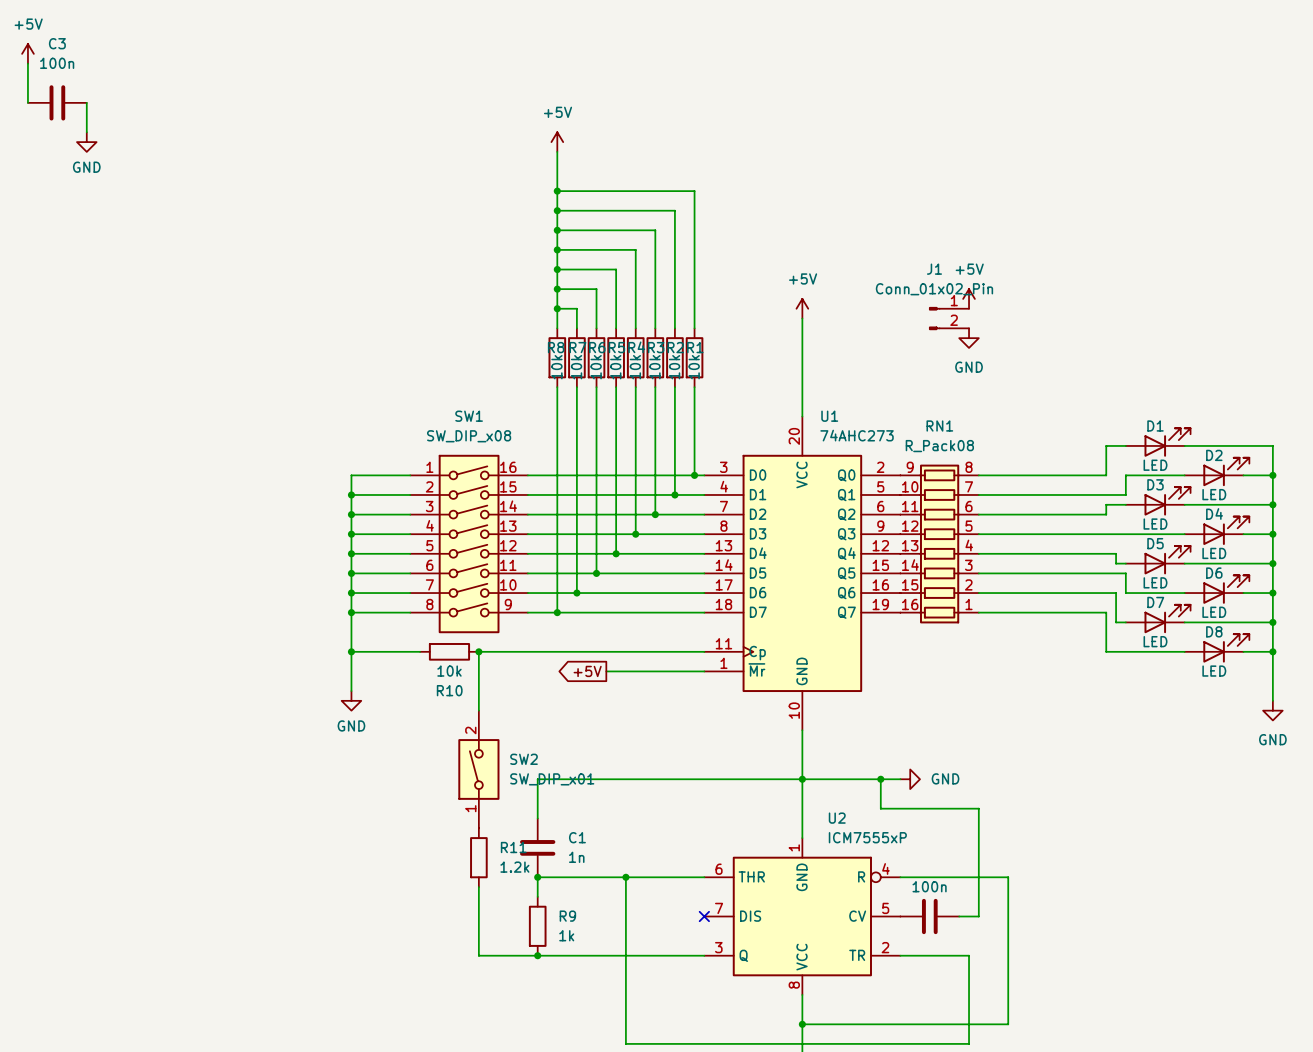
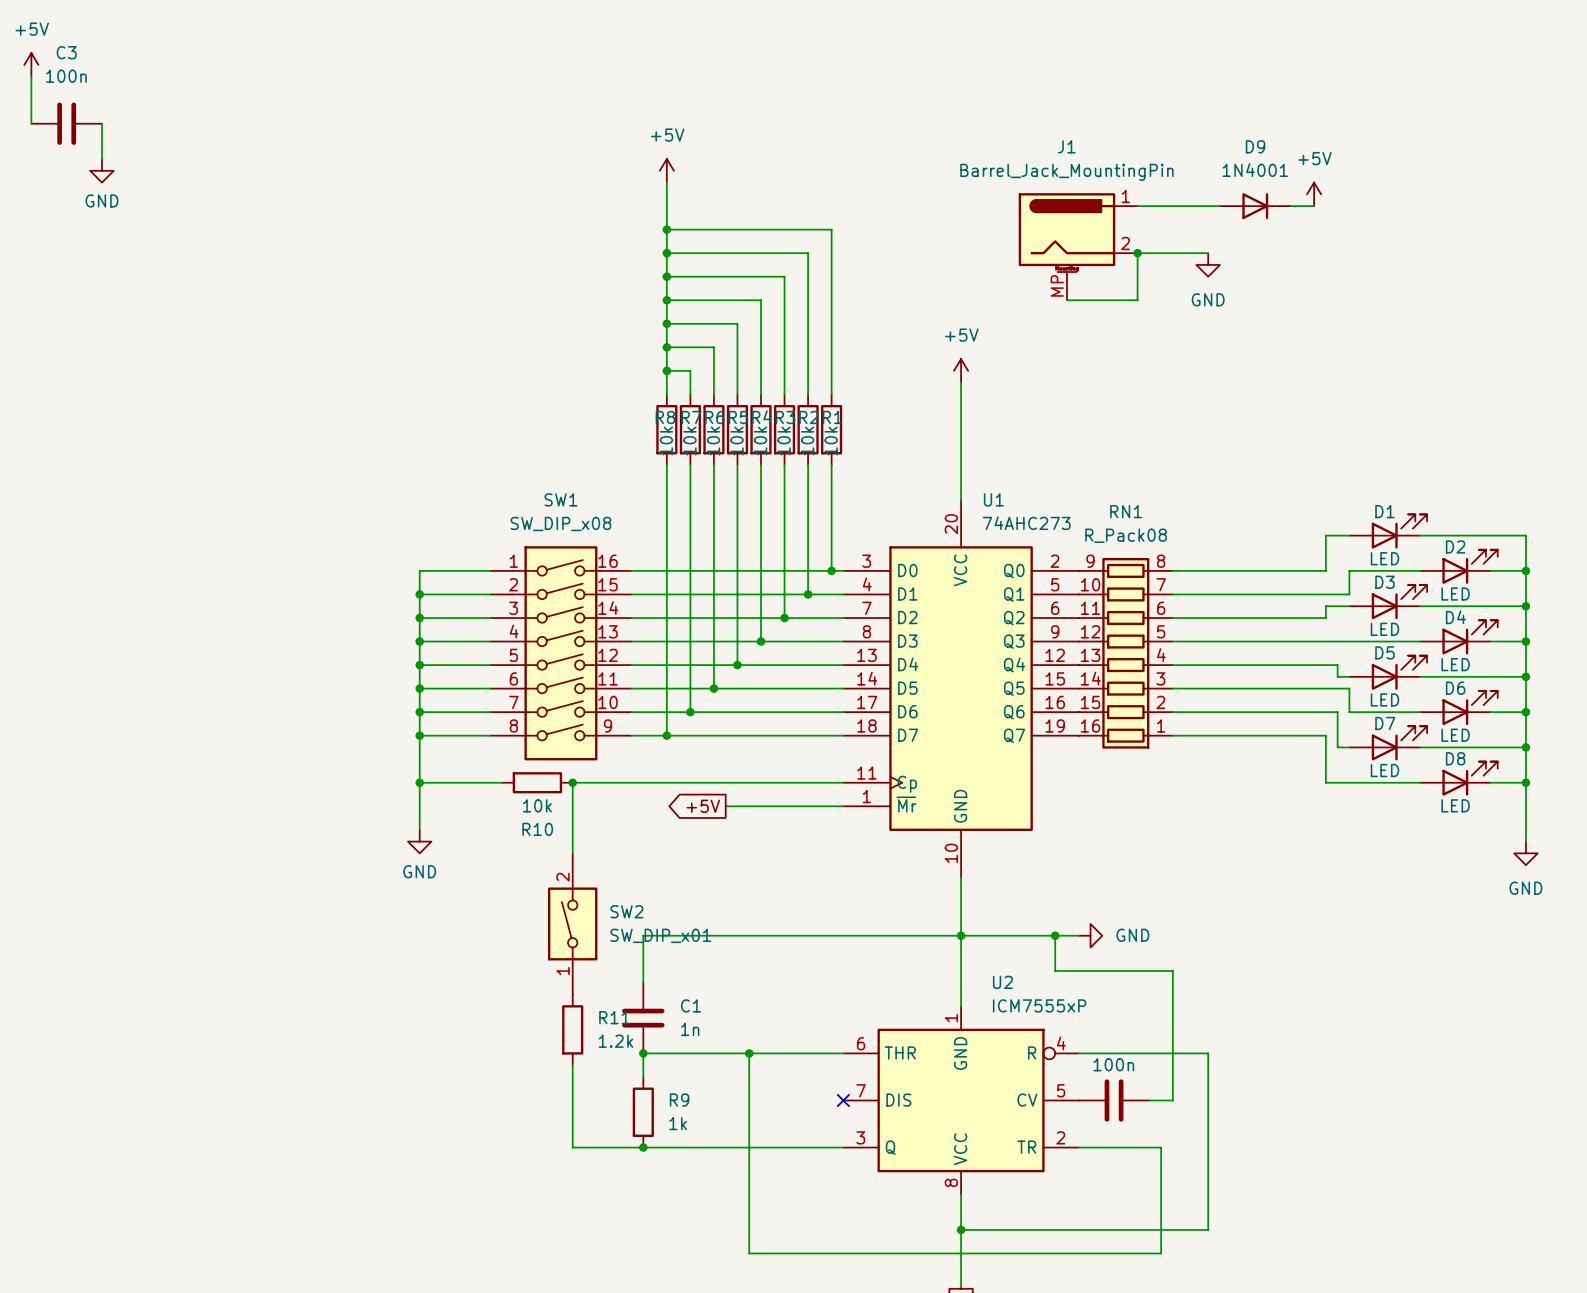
wire: none -> (1137, 206) (1219, 206)
D9: none -> 1N4001 (1255, 206)
wire: none -> (1290, 206) (1314, 206)
junction: none -> (1137, 253)
wire: none -> (1208, 253) (1137, 253) (1137, 300) (1066, 300)
J1 name position: J1 (934, 269) -> J1 (1066, 146)
J1 value: Conn_01x02_Pin (934, 289) -> Barrel_Jack_MountingPin (1066, 172)
power symbol position: +5V (969, 298) -> +5V (1314, 194)
J1 symbol: [929, 307, 970, 330] -> [1018, 193, 1138, 301]
power symbol position: GND (969, 338) -> GND (1208, 264)

